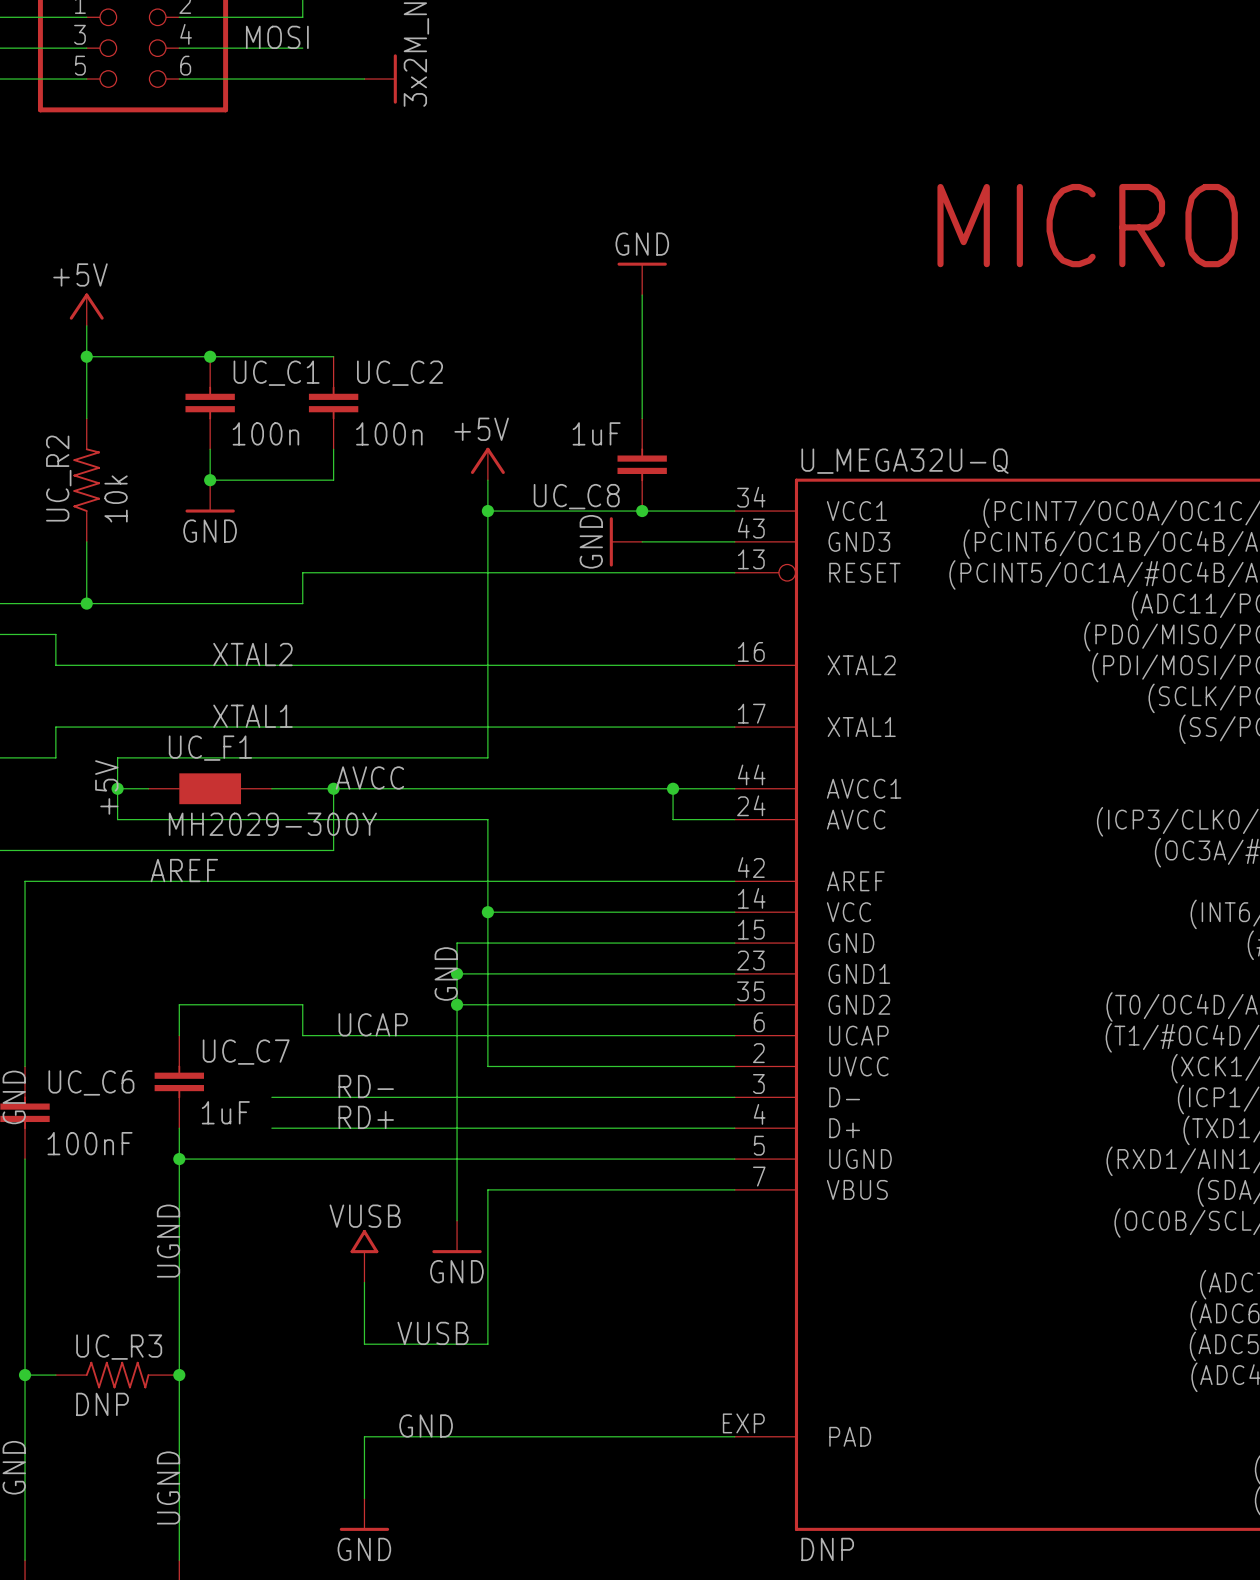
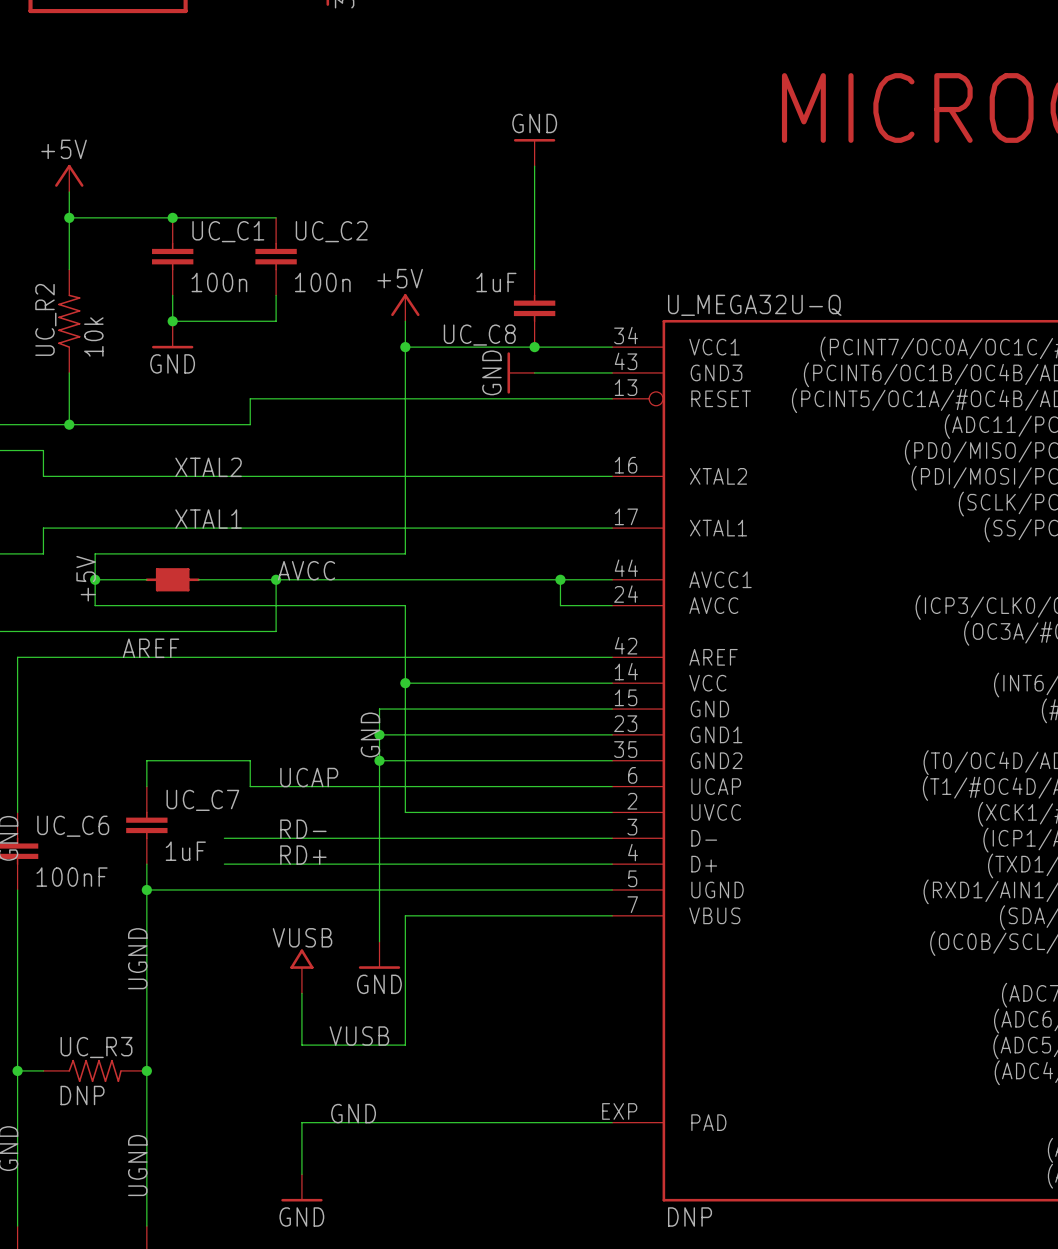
UC_F1: MH2029-300Y (210, 788) -> none
part: none -> (172, 579)

